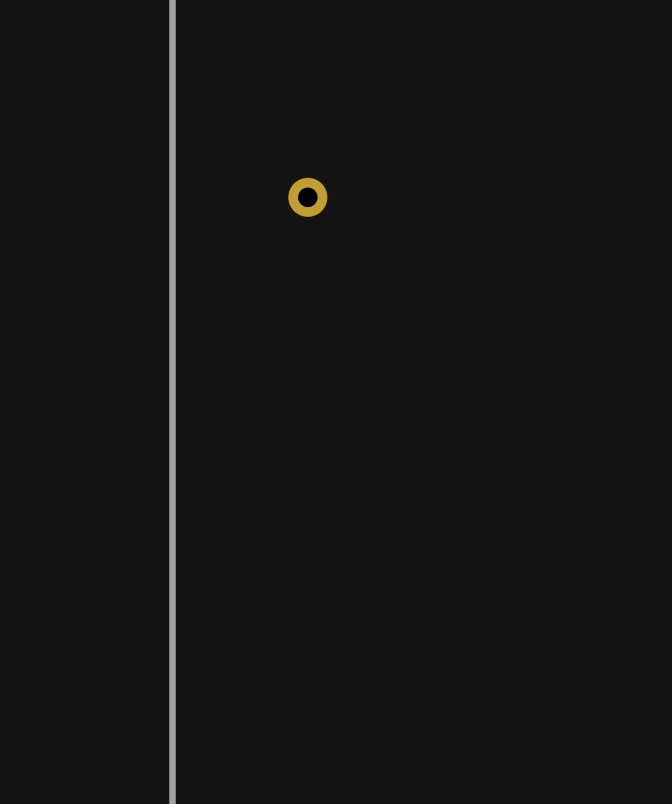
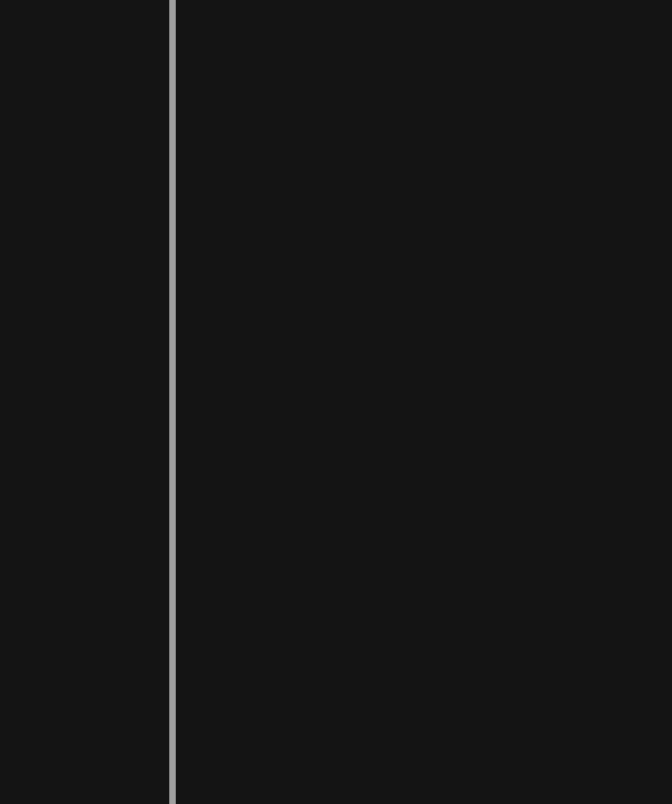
via: (307, 197) -> none

